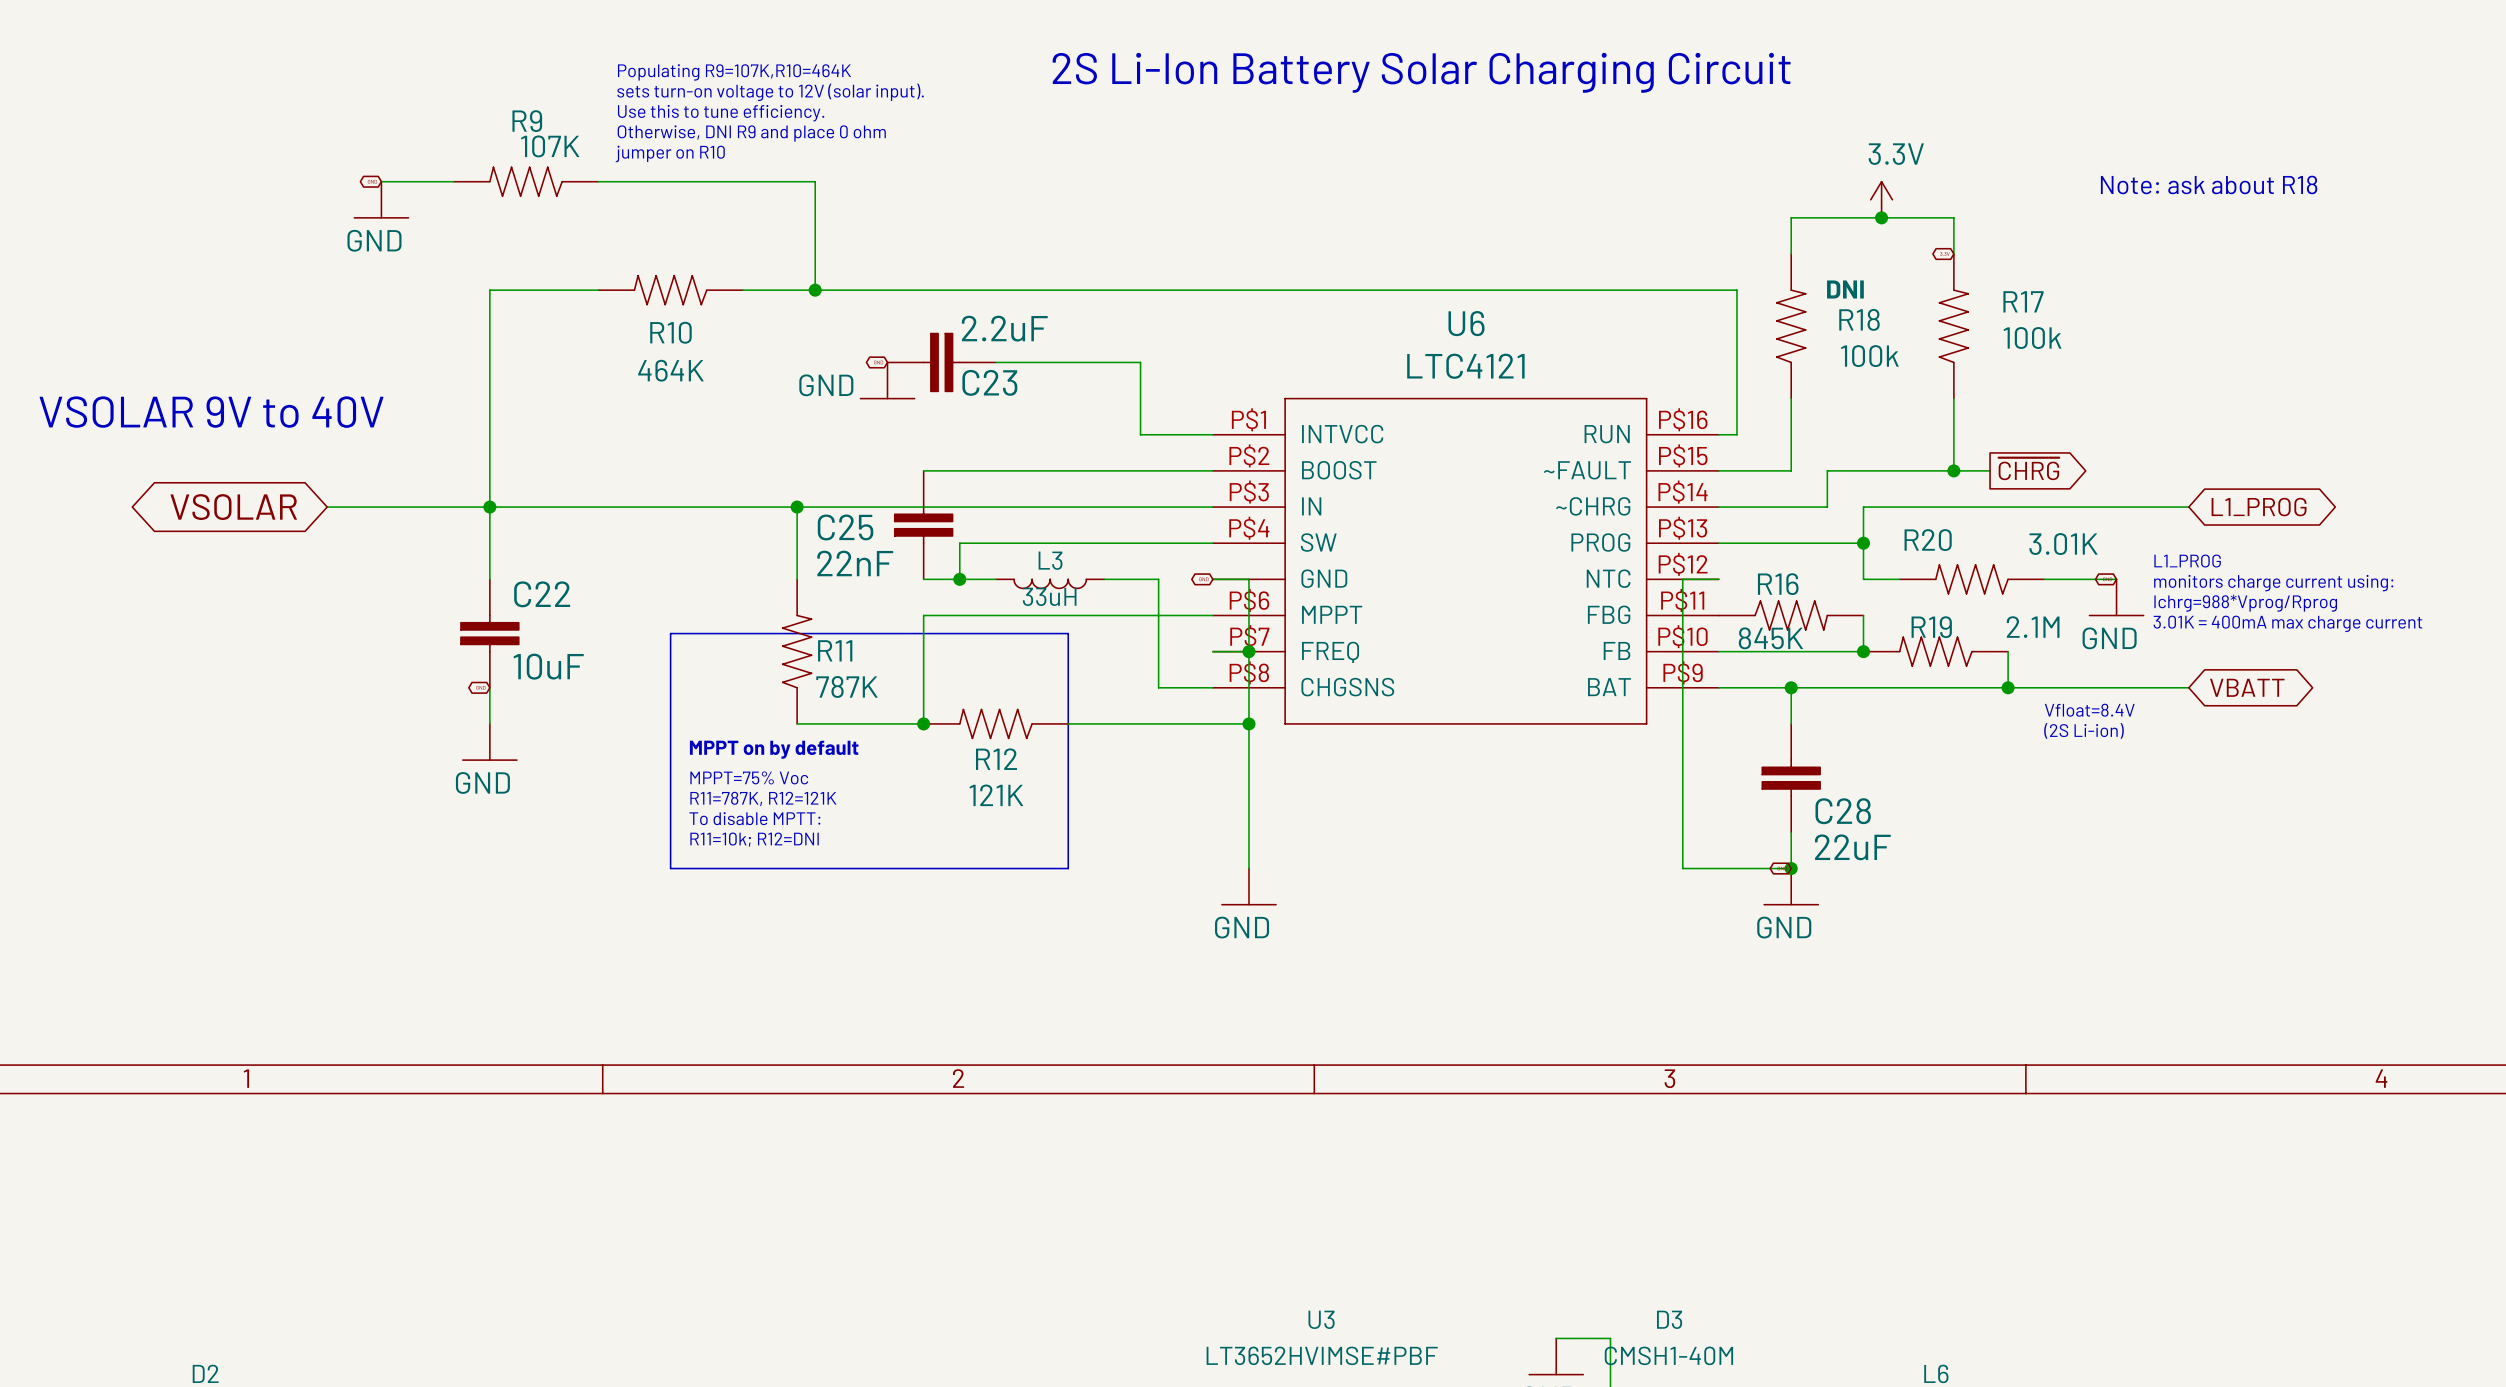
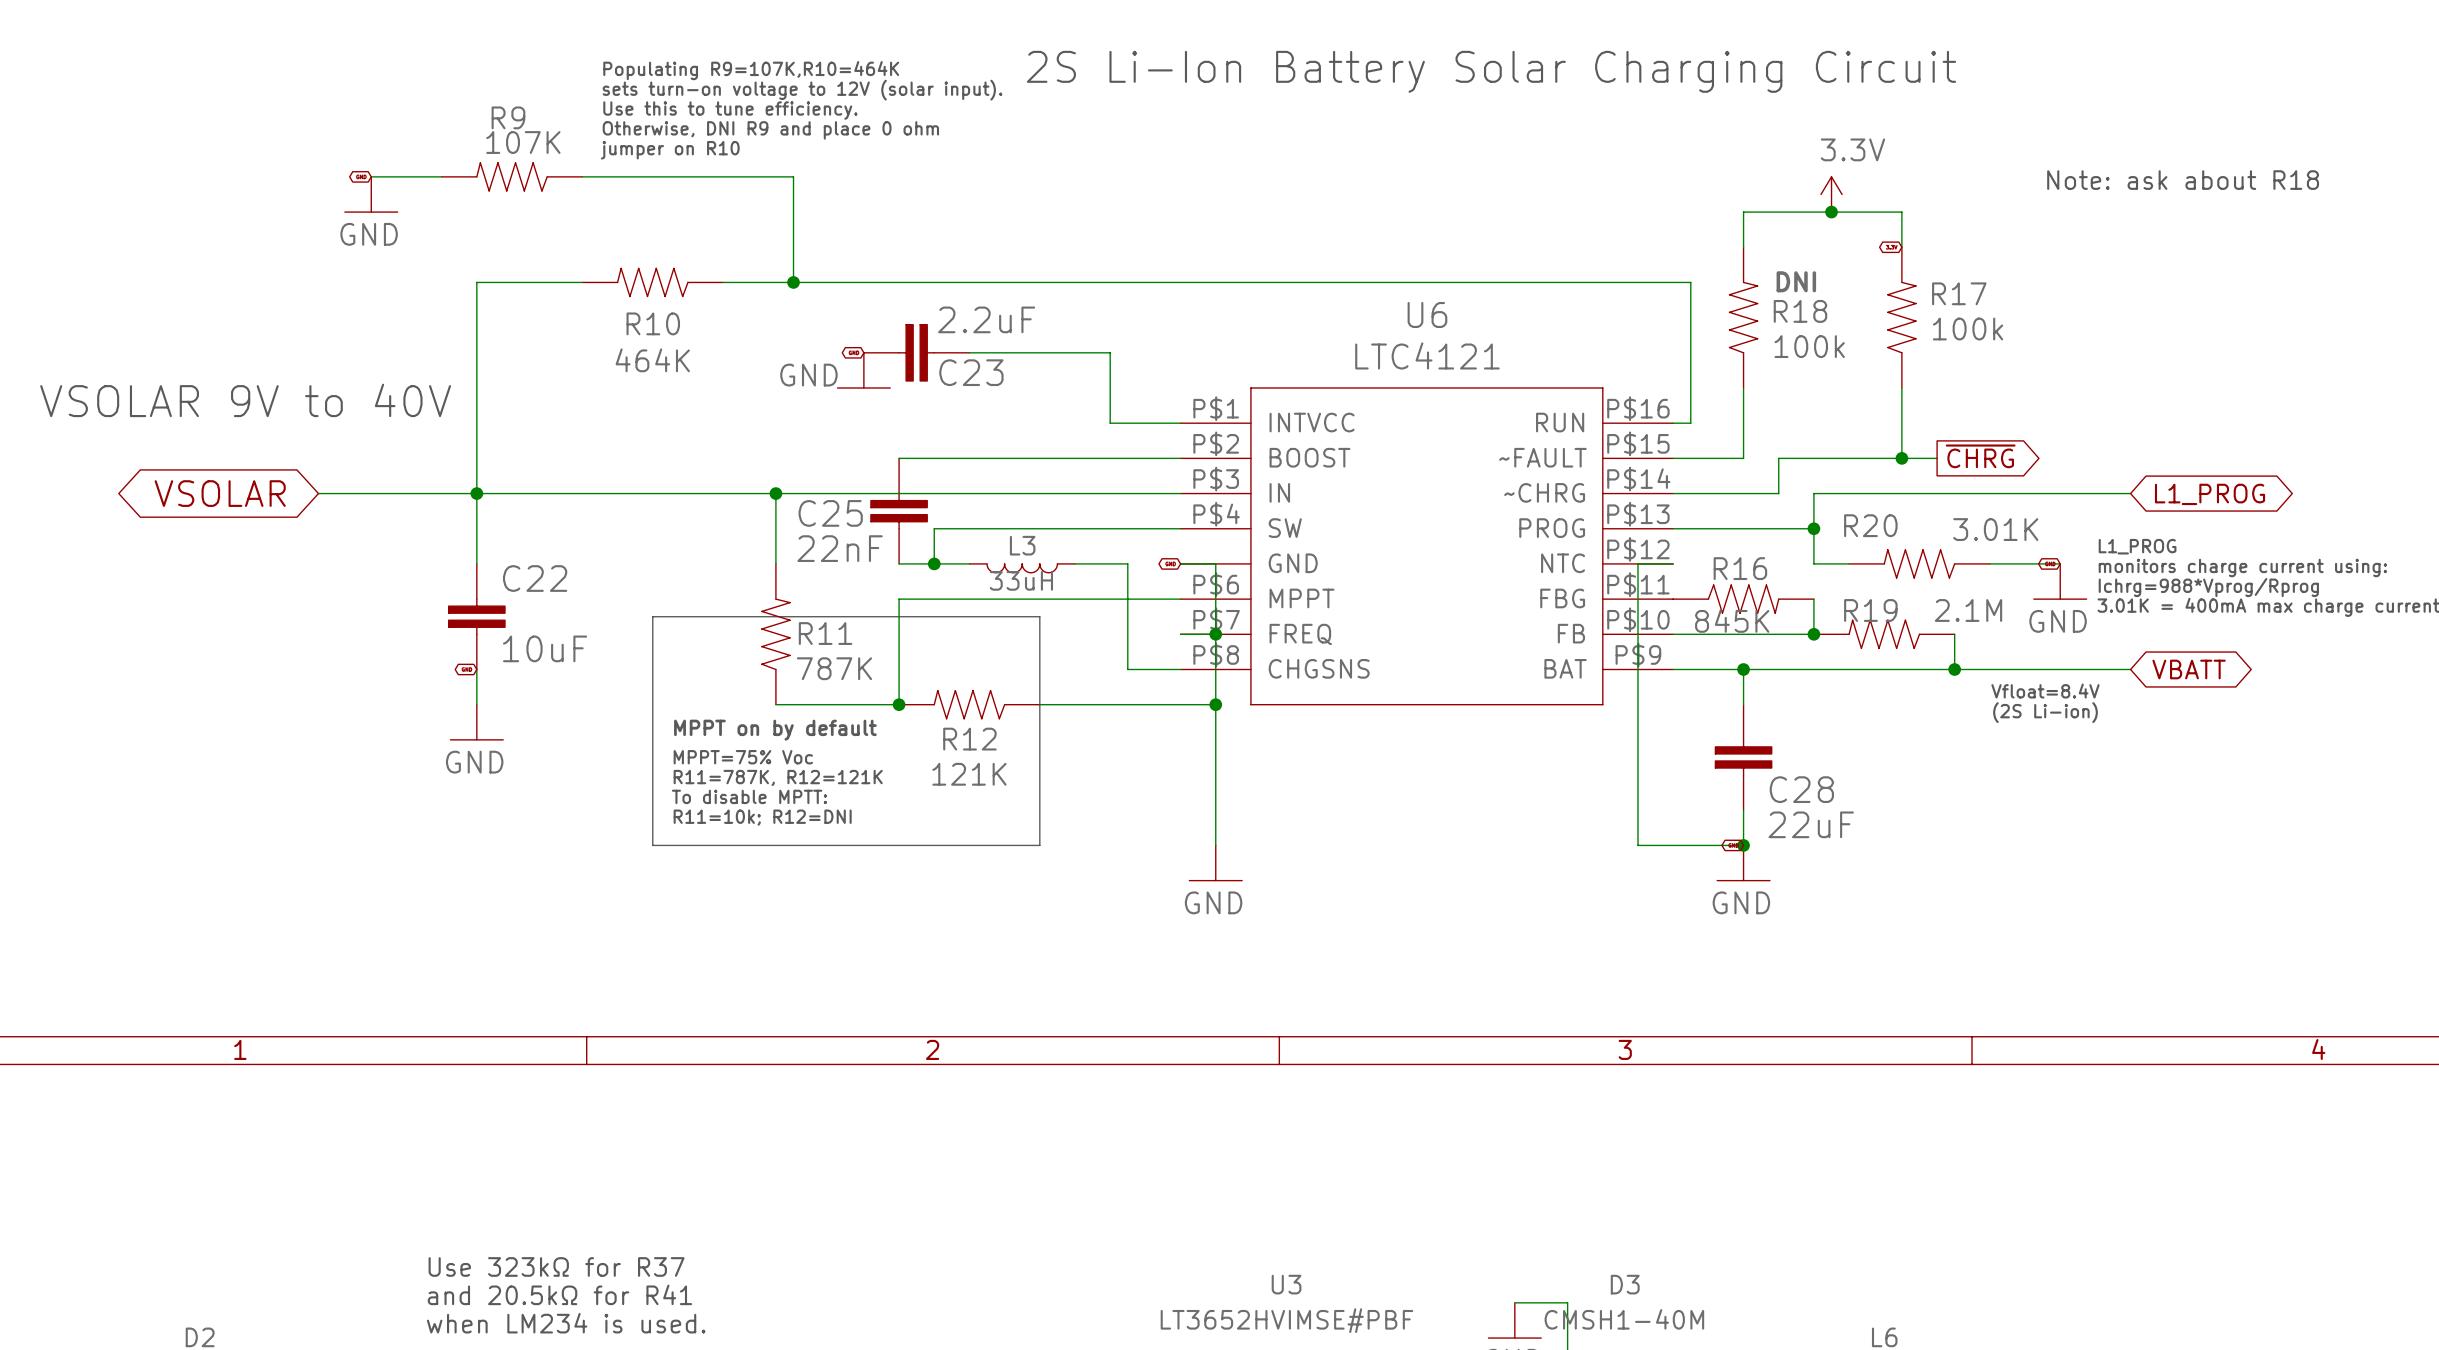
text: none -> Use 323kΩ for R37 (556, 1266)
text: none -> and 20.5kΩ for R41 (559, 1294)
text: none -> when LM234 is used. (566, 1323)

